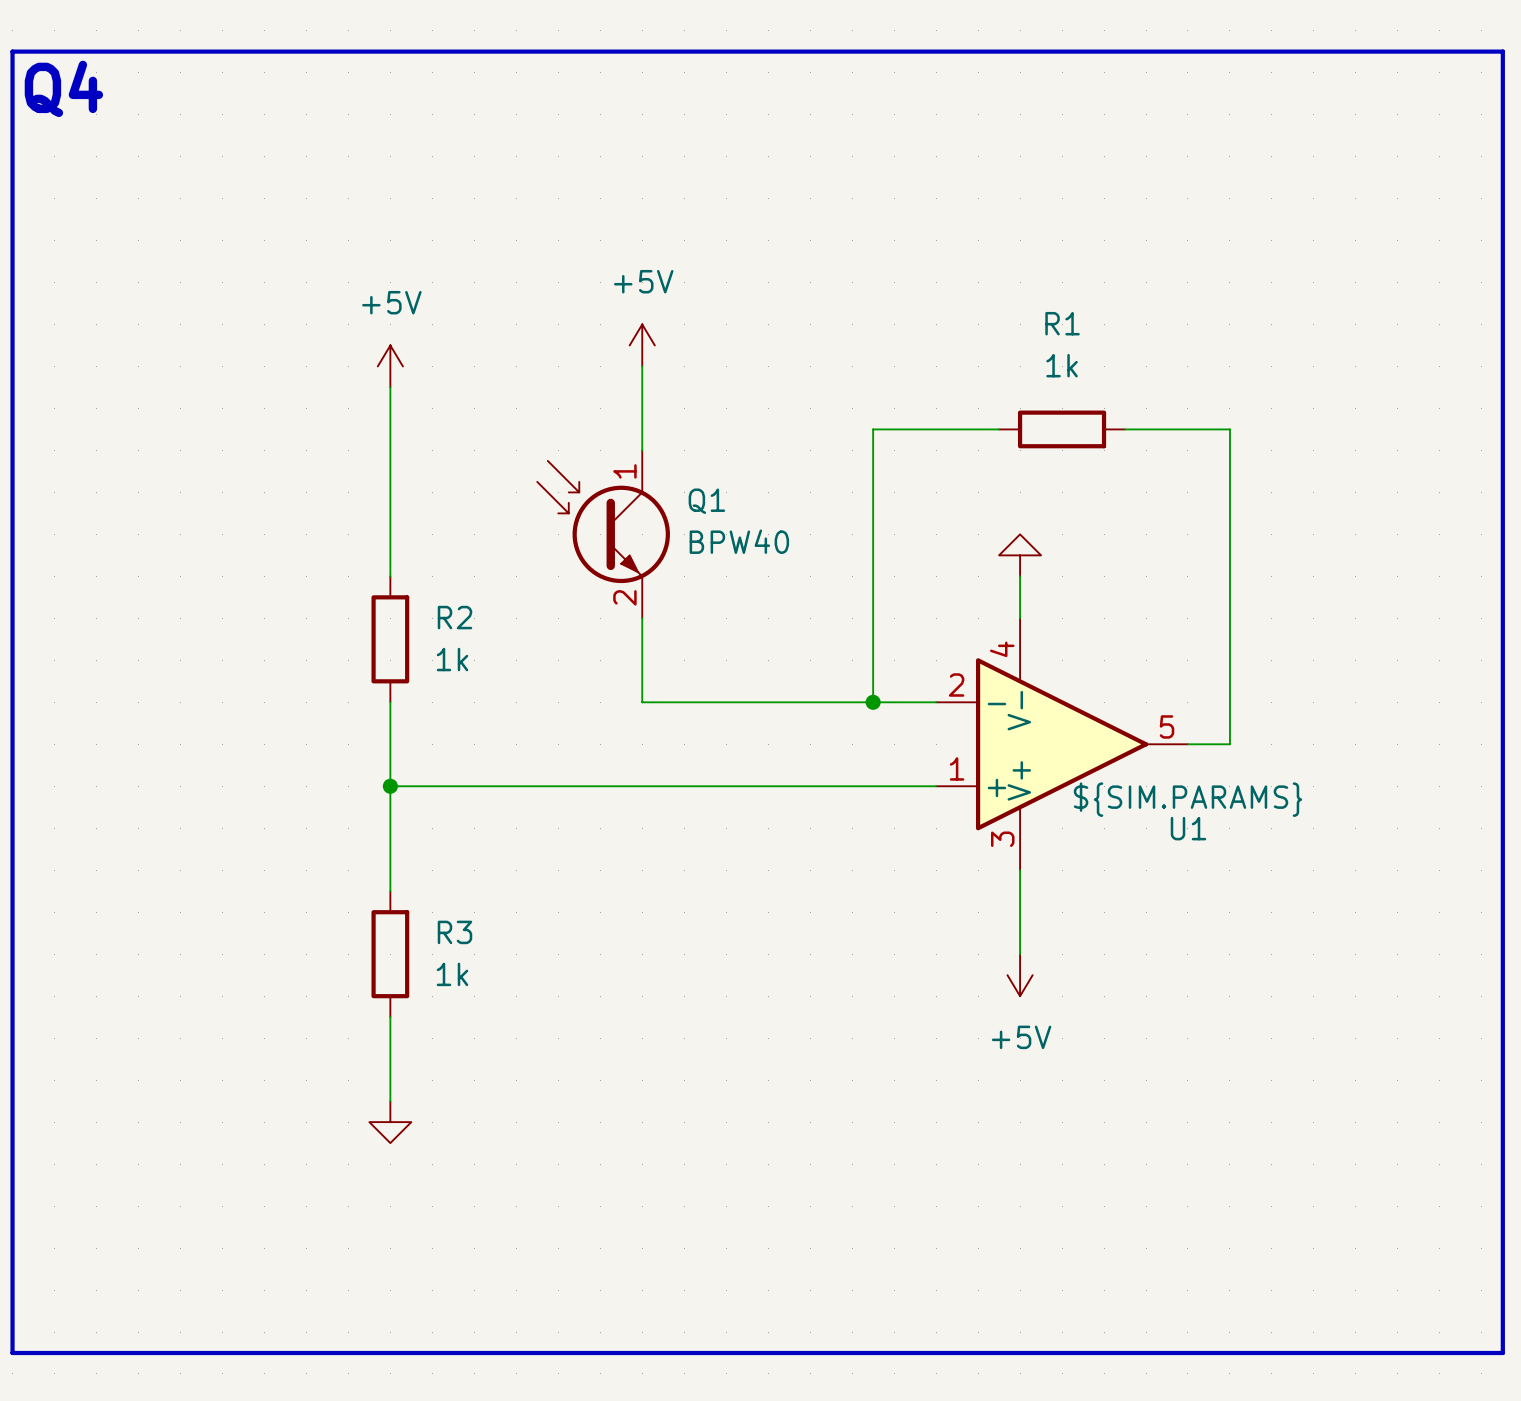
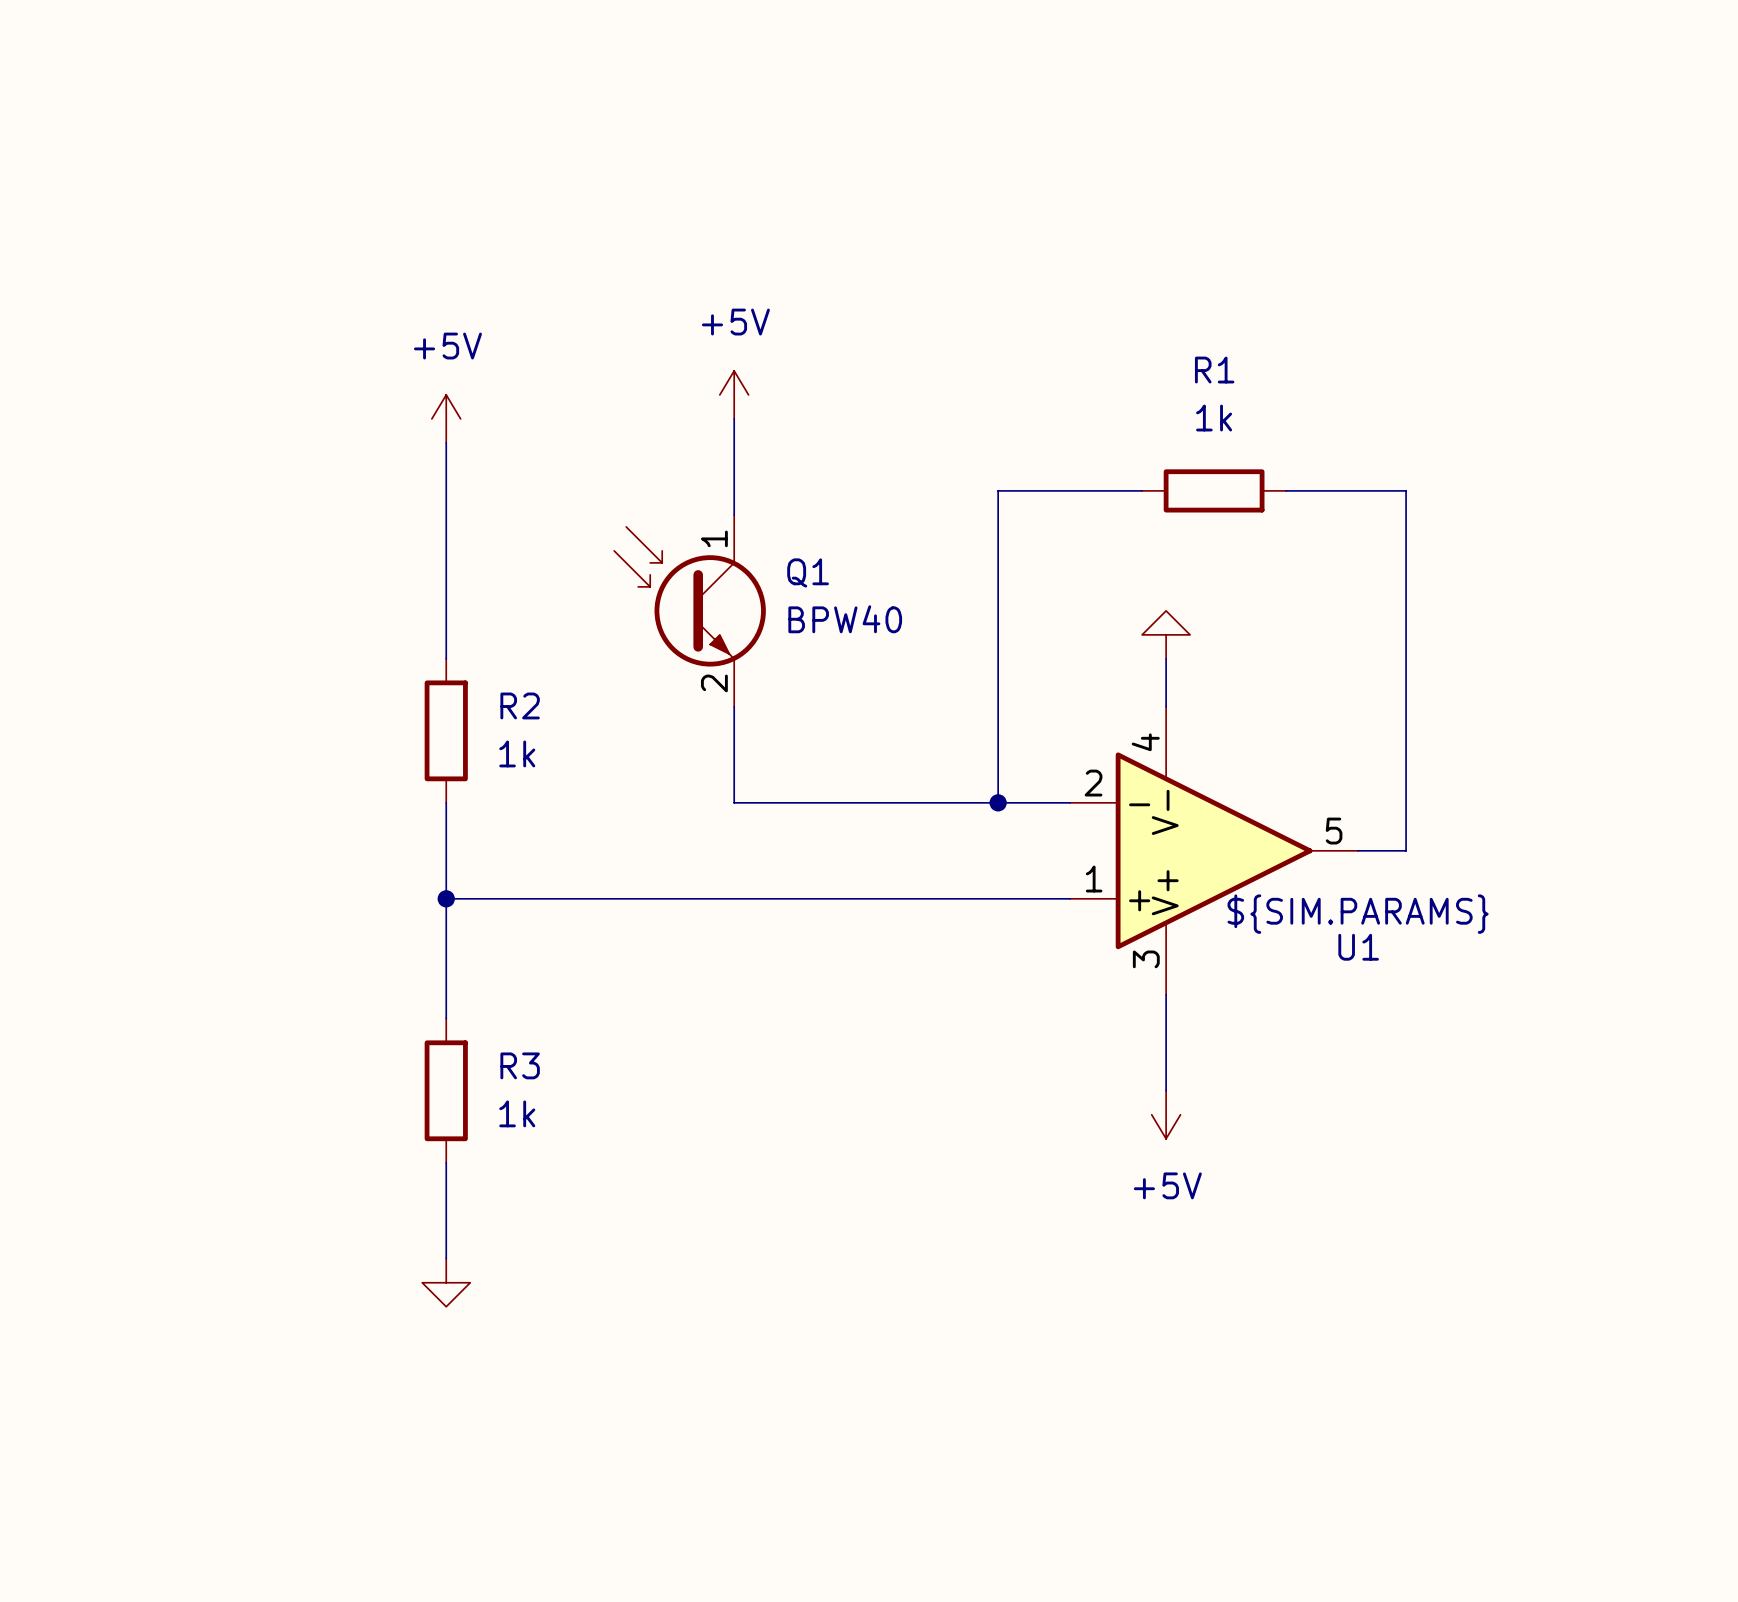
line: (12, 51) (1502, 51) (1502, 1353) (12, 1353) (12, 51) -> none
text: Q4 (63, 88) -> none

